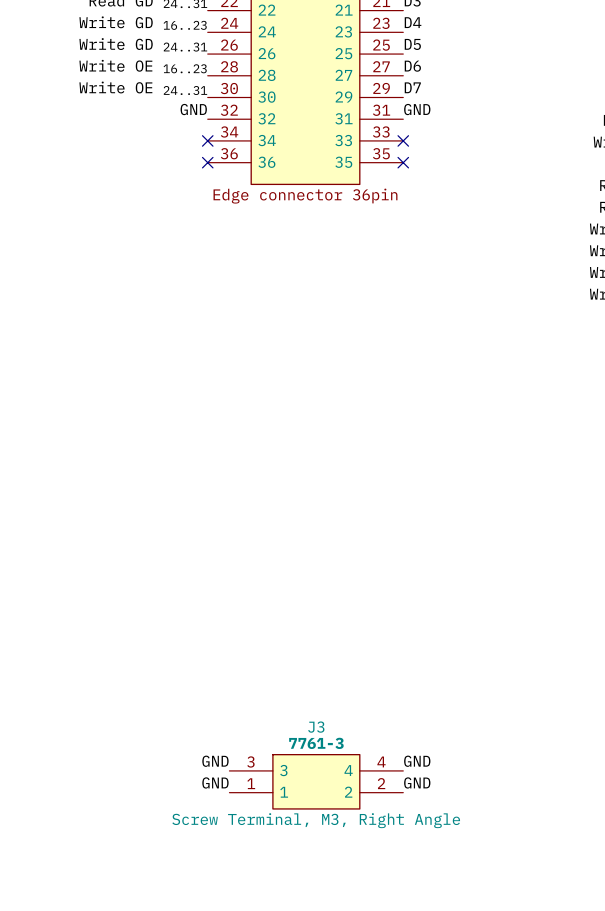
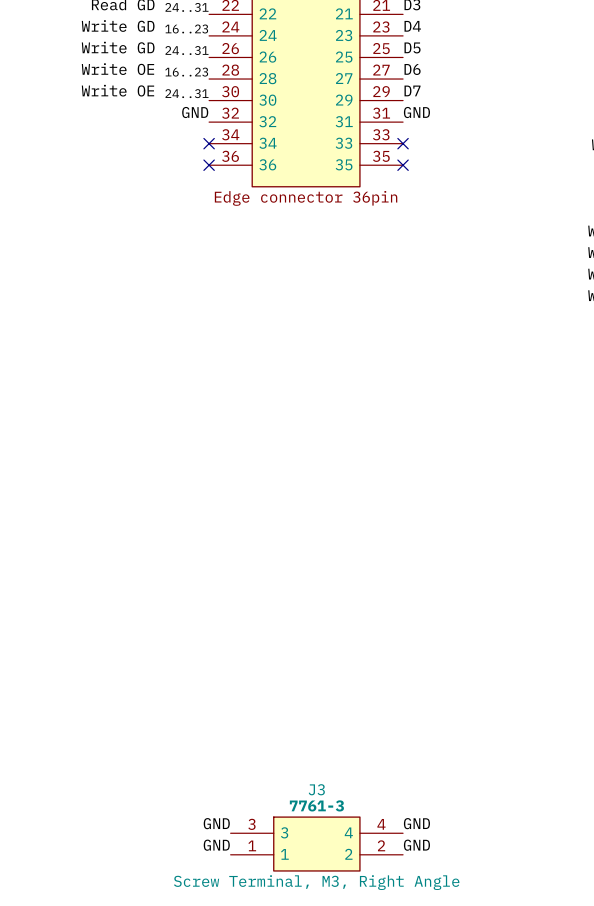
label: GND (215, 761) -> none
label: GND (417, 761) -> none
J3 position: (316, 781) -> (316, 844)
label: GND (215, 782) -> none
label: GND (417, 782) -> none
label: none -> GND (216, 823)
label: none -> GND (416, 823)
label: none -> GND (216, 845)
label: none -> GND (416, 845)

